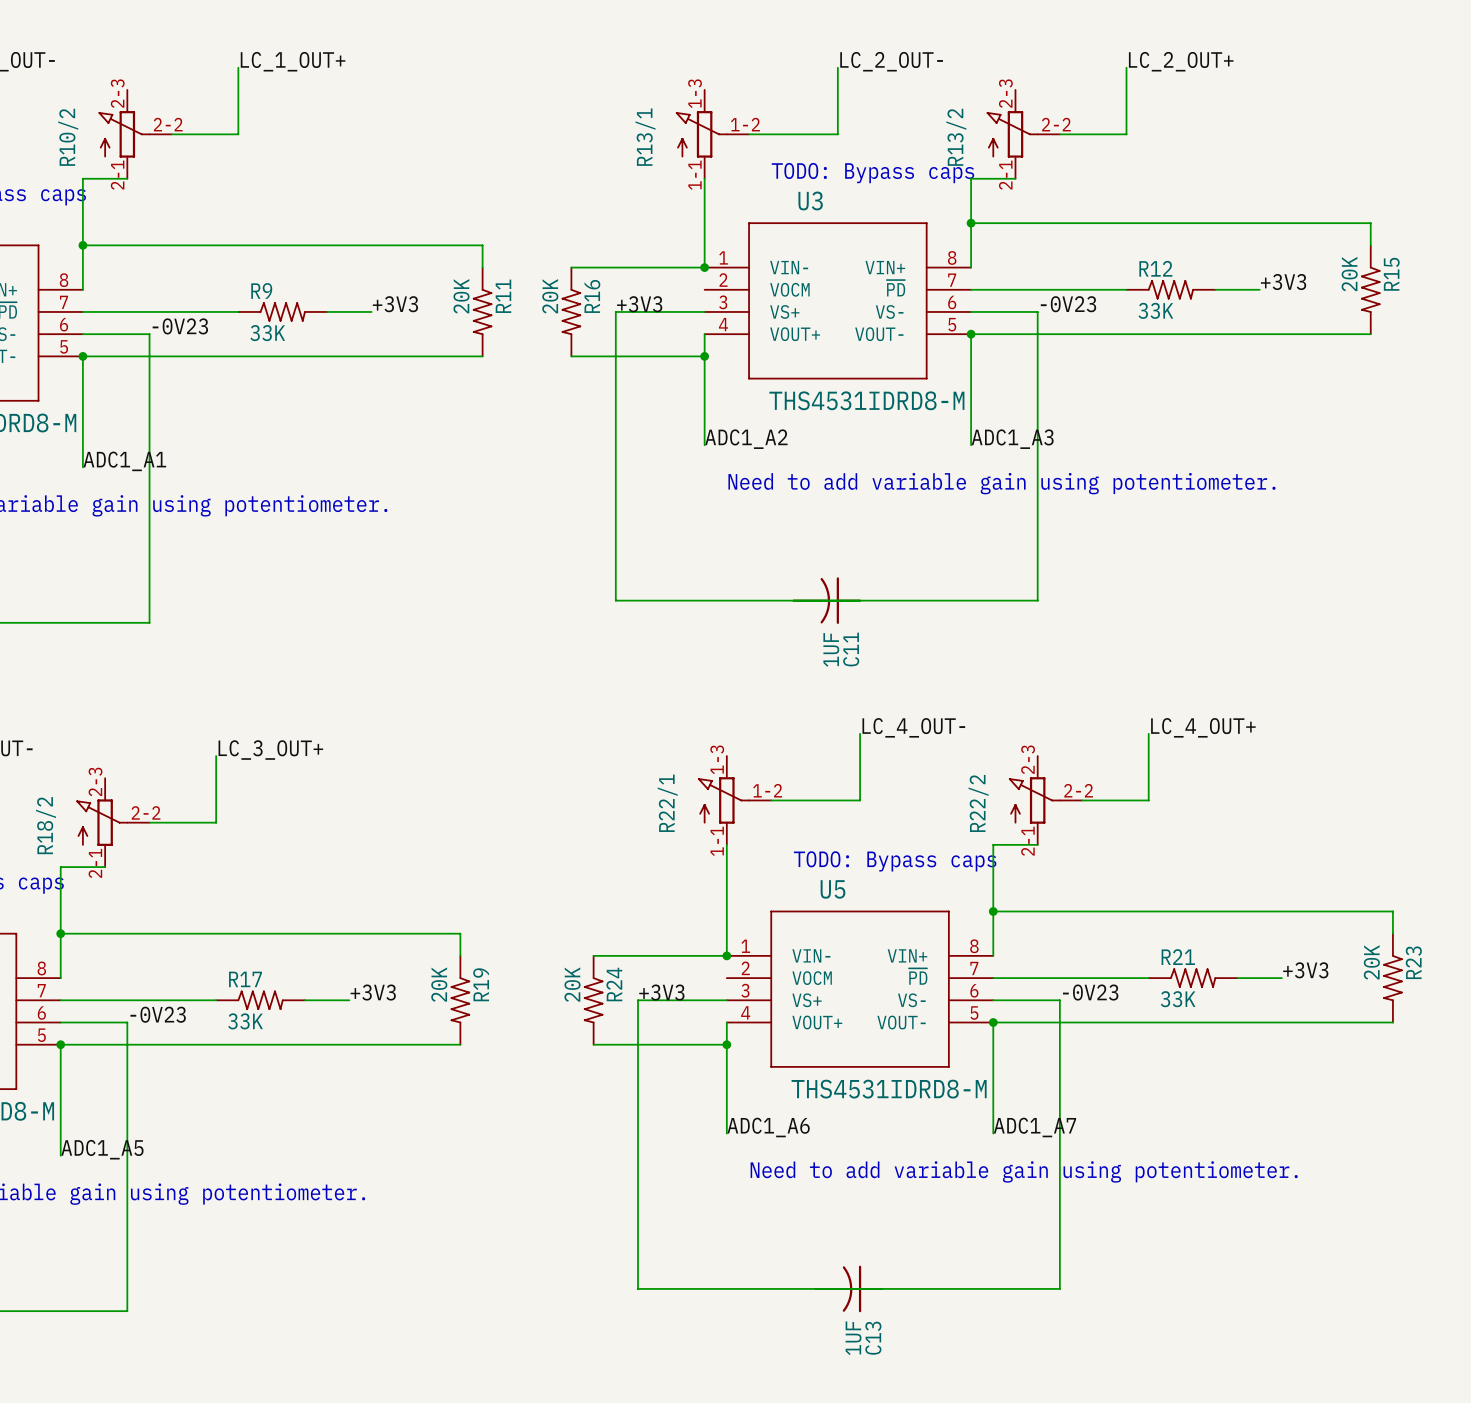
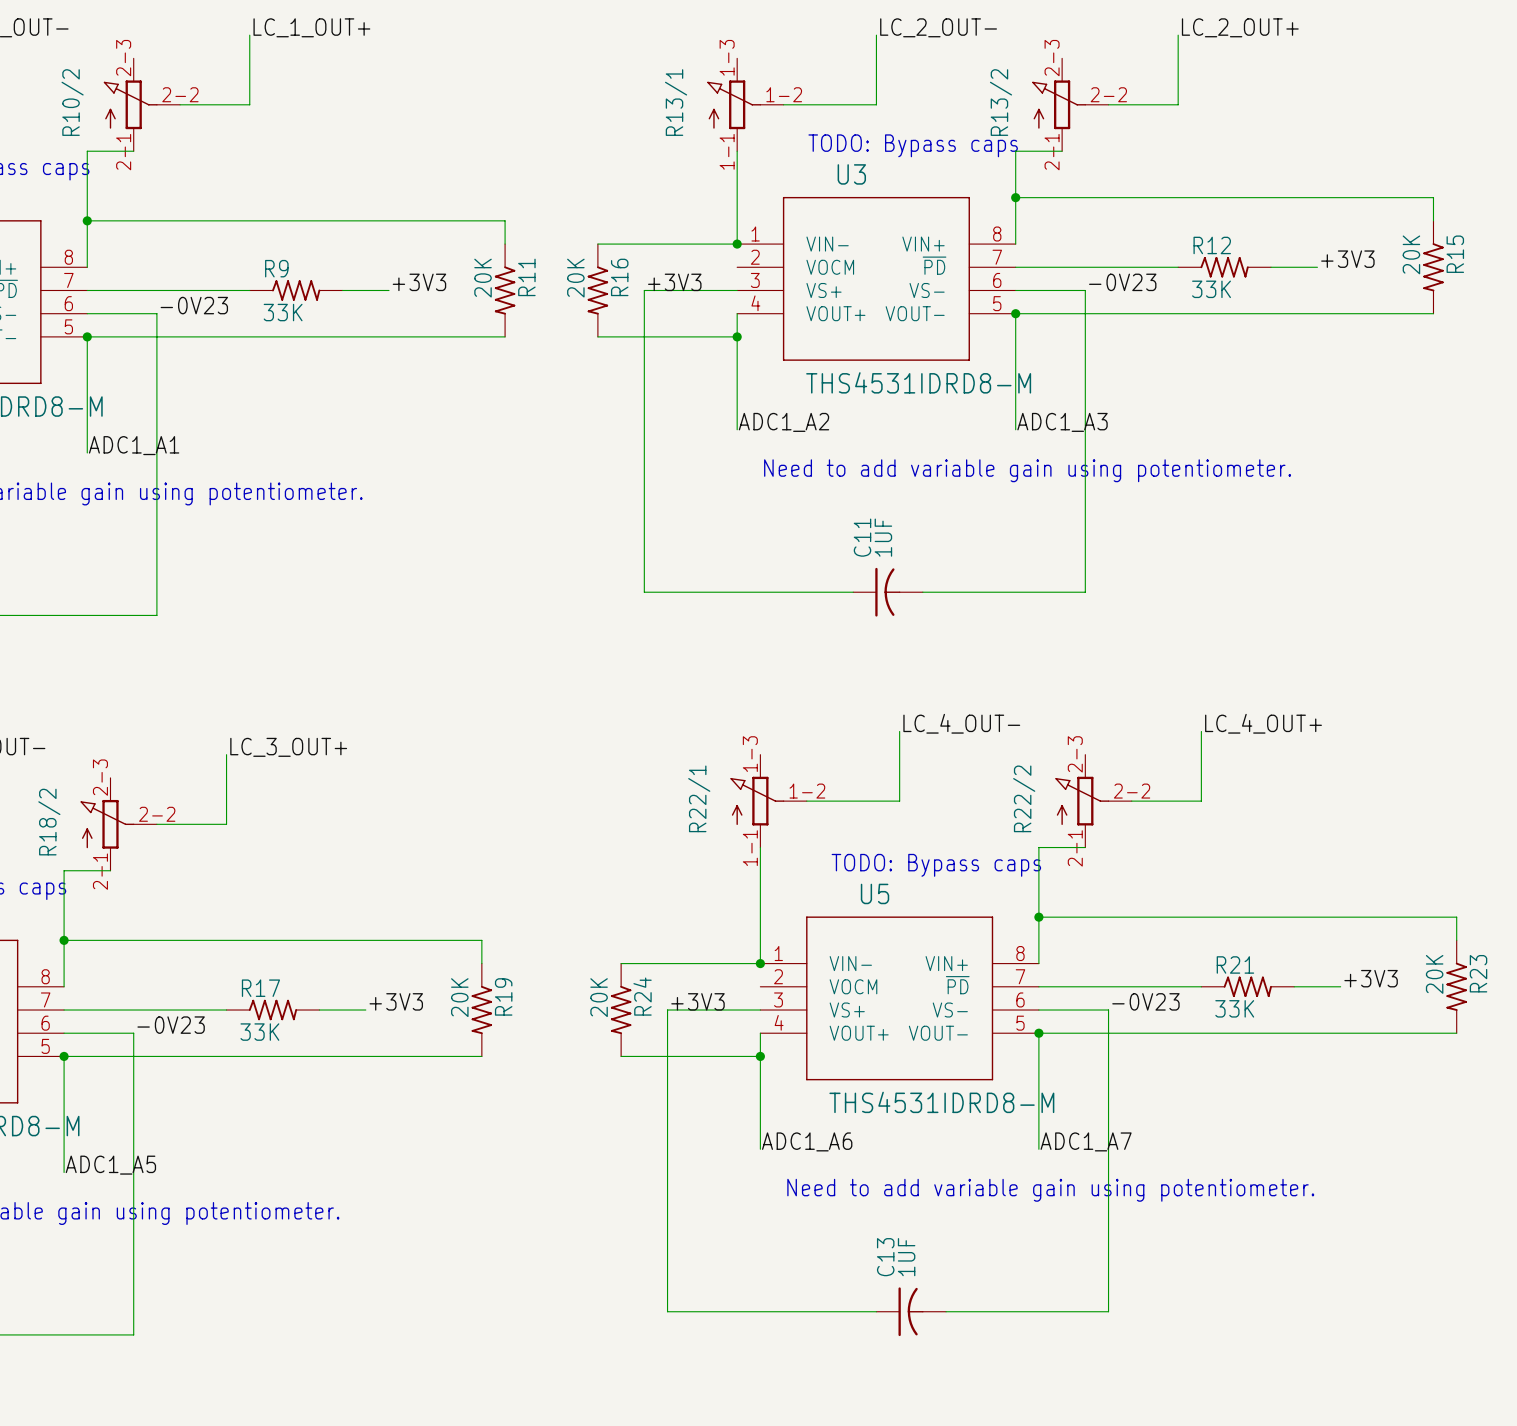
C11 rotation: 0° (826, 600) -> 180° (887, 592)
C13 rotation: 0° (849, 1288) -> 180° (911, 1311)

